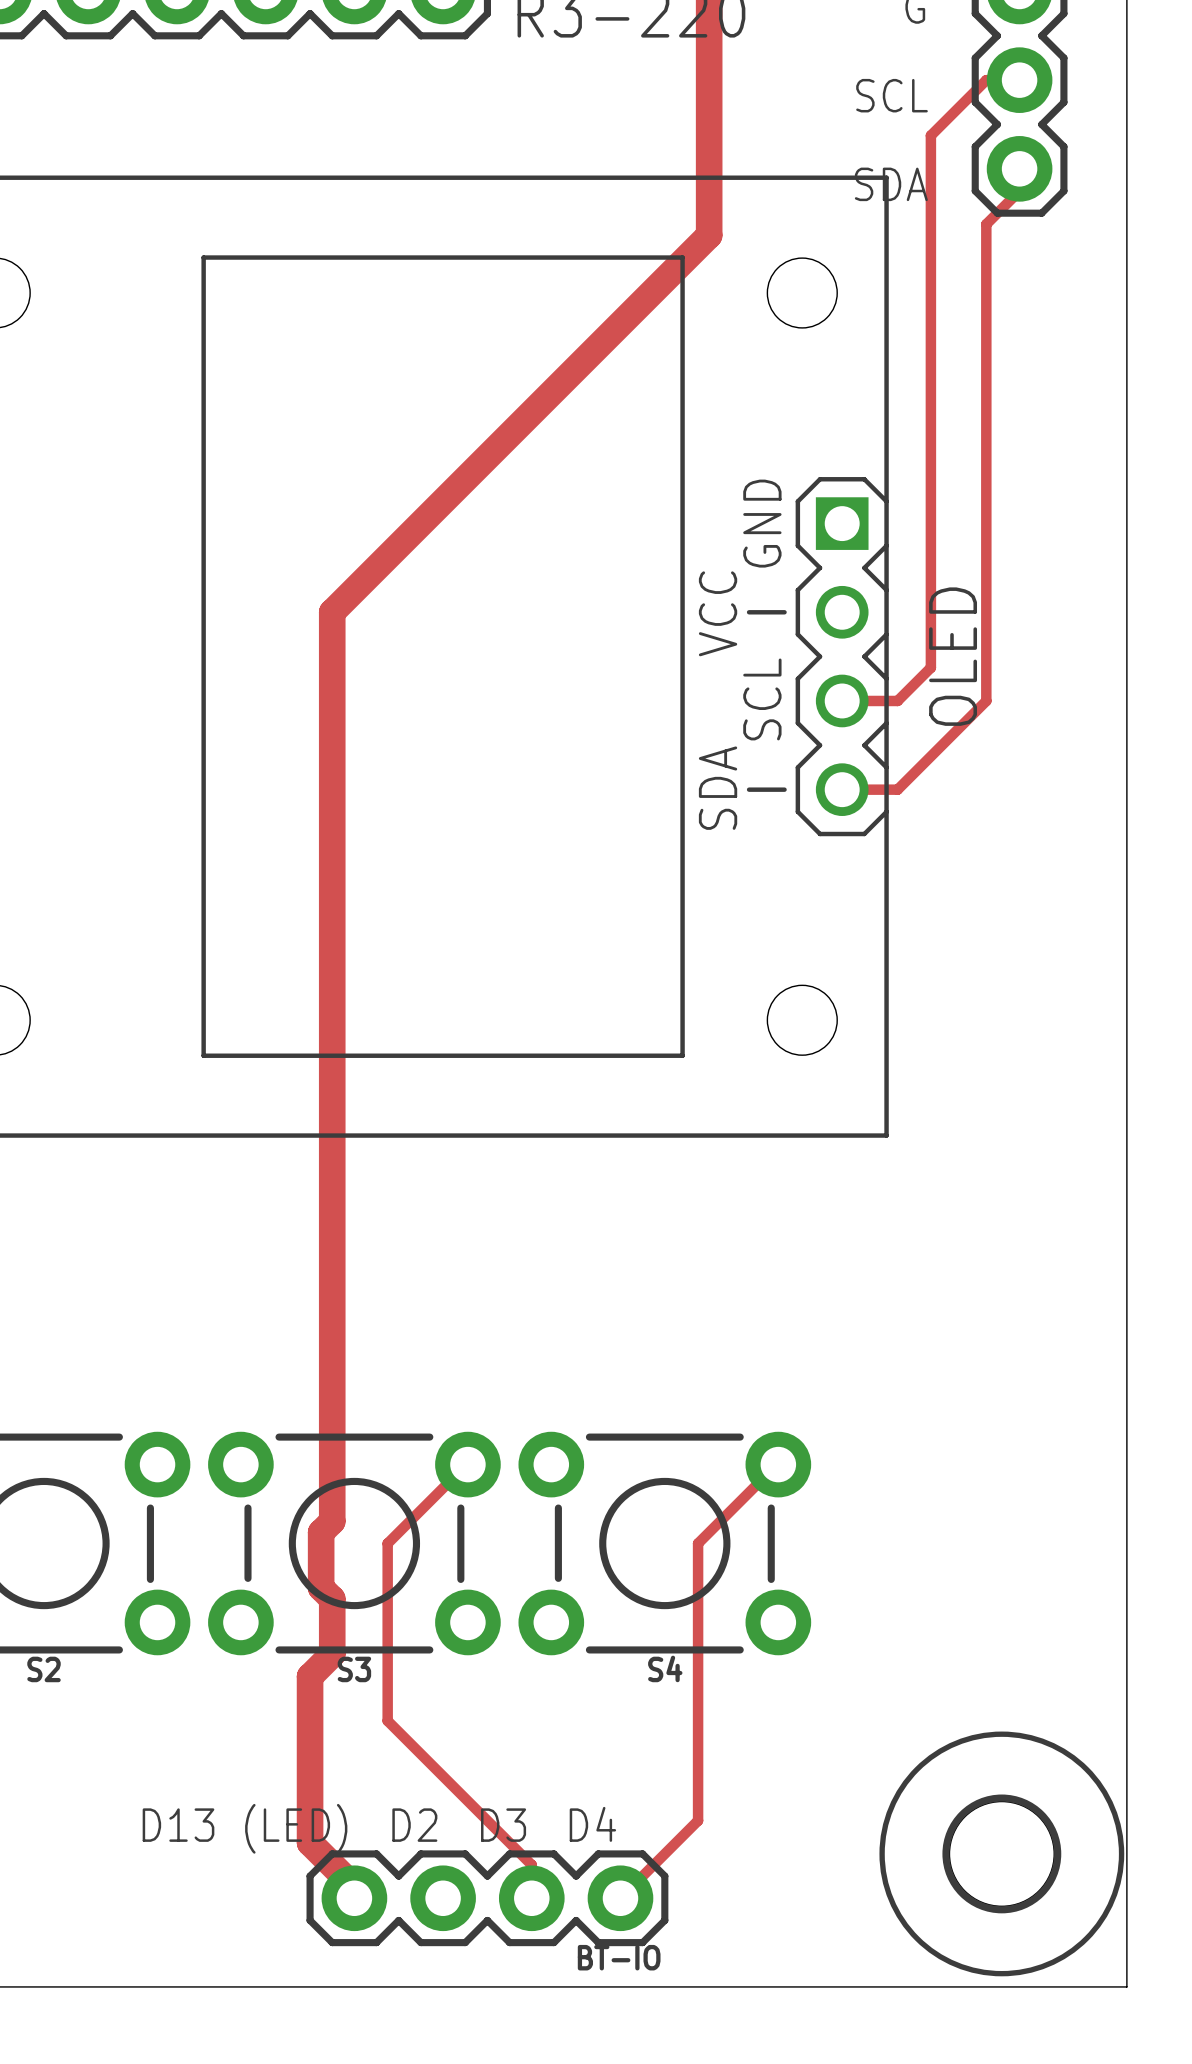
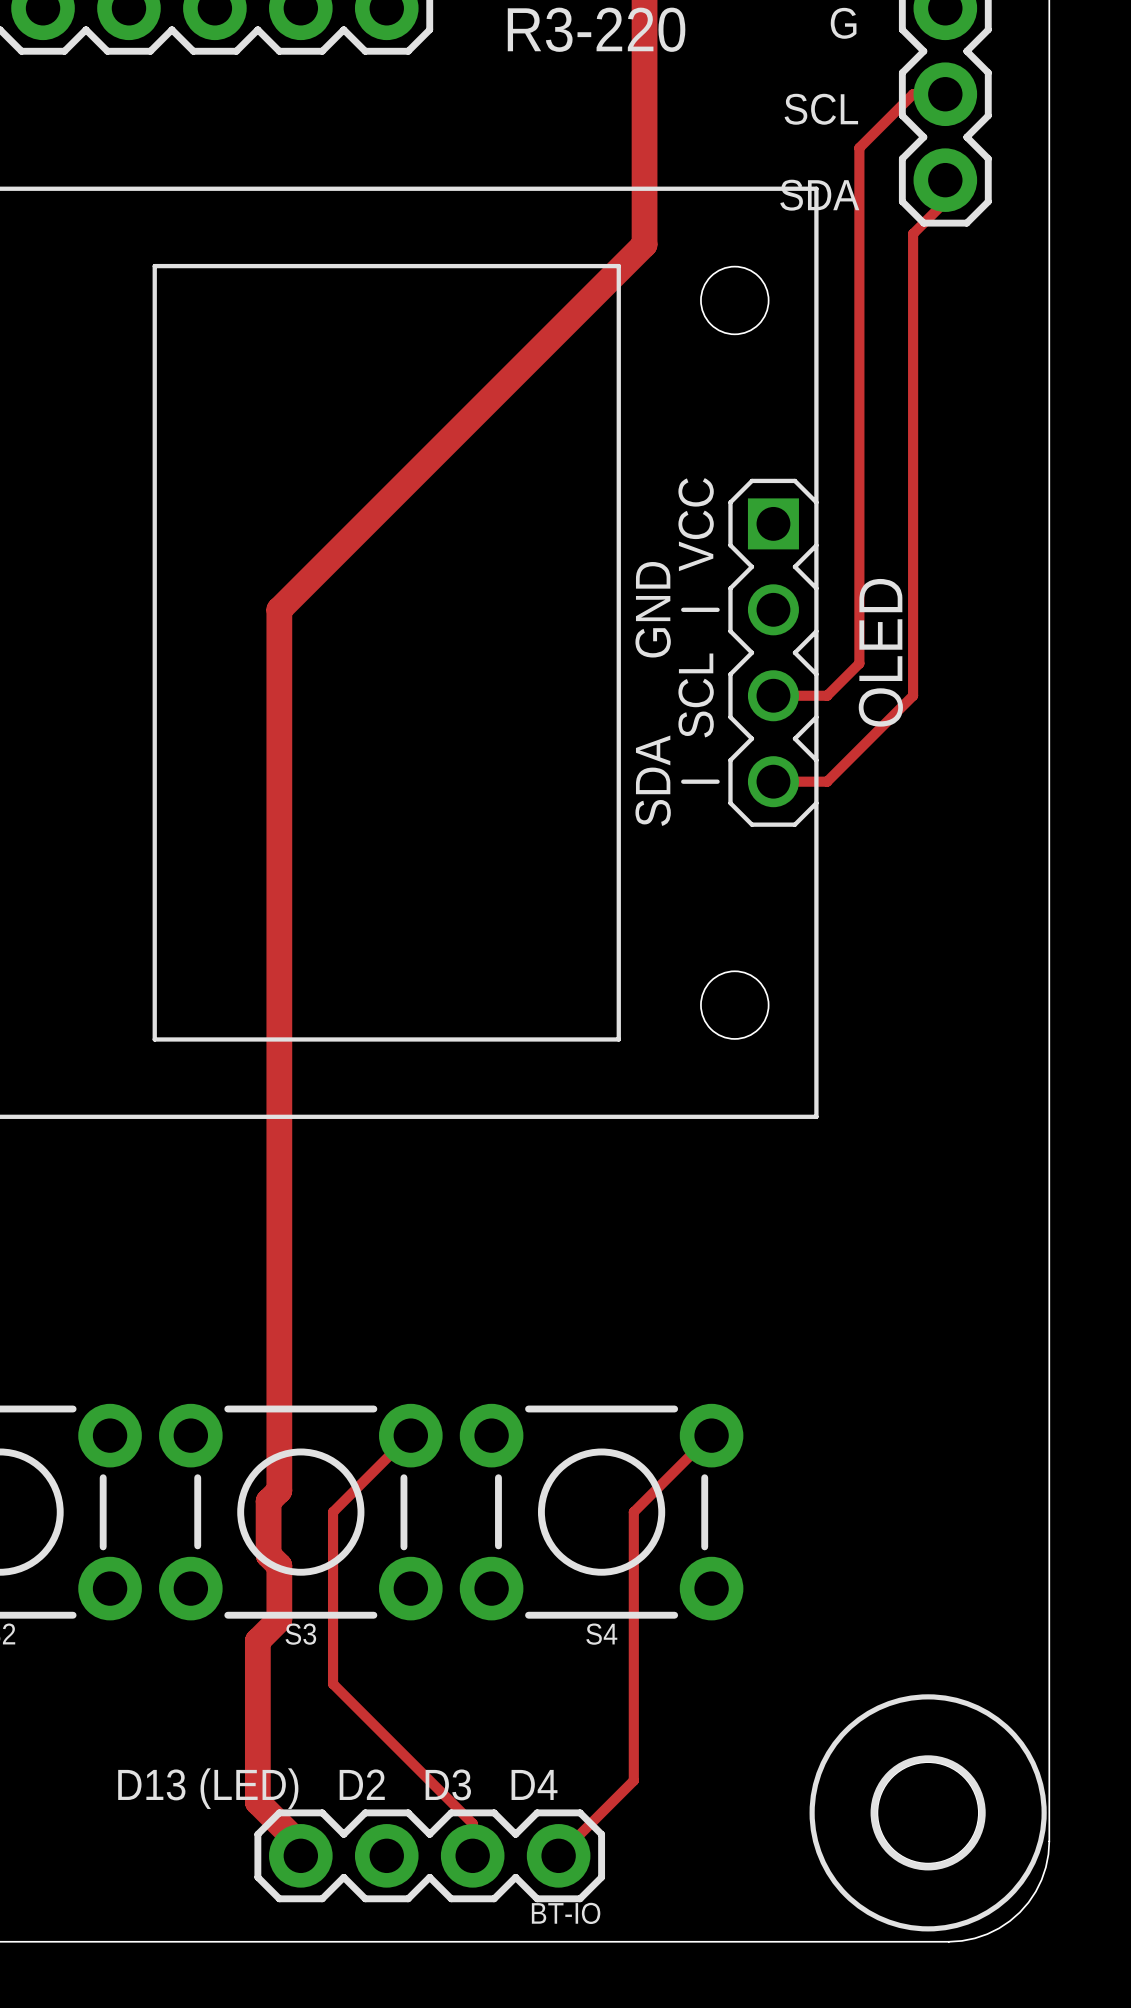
OLED text: GND (762, 523) -> VCC (696, 524)
OLED text: VCC (718, 613) -> GND (653, 609)
board edge: (1126, 1883) (1126, 1986) (1023, 1986) -> (1049, 1841) (1045, 1867) (1041, 1879) (1028, 1902) (1019, 1912) (1010, 1921) (987, 1934) (974, 1938) (948, 1941)

